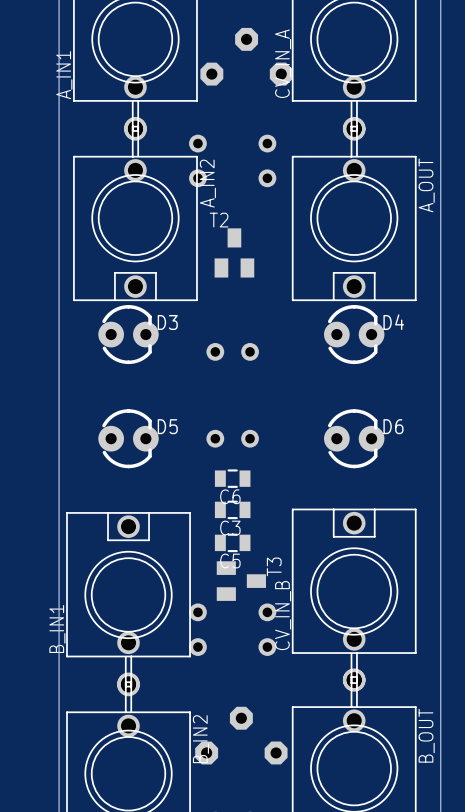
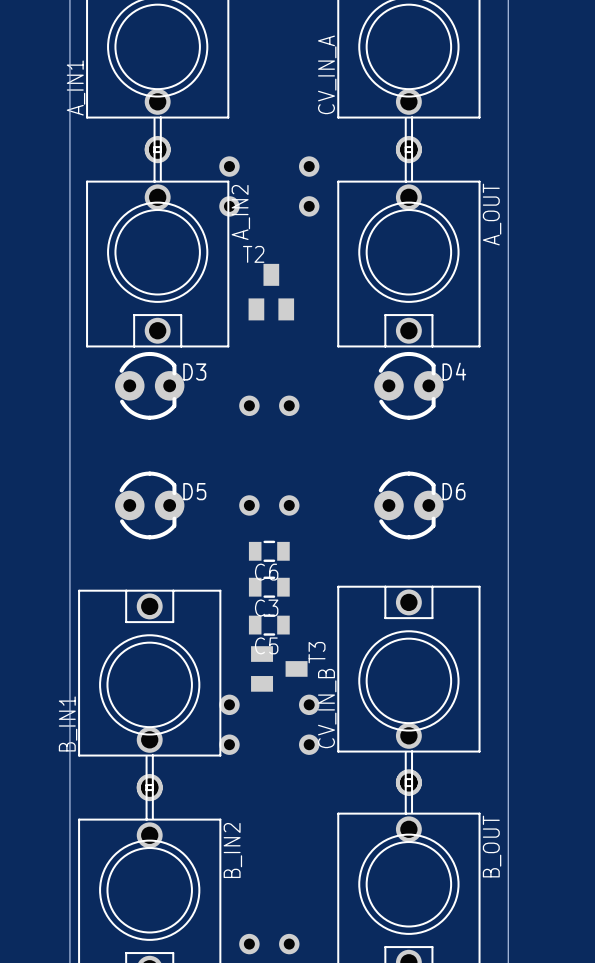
part: (246, 56) -> none
part: (241, 735) -> none

